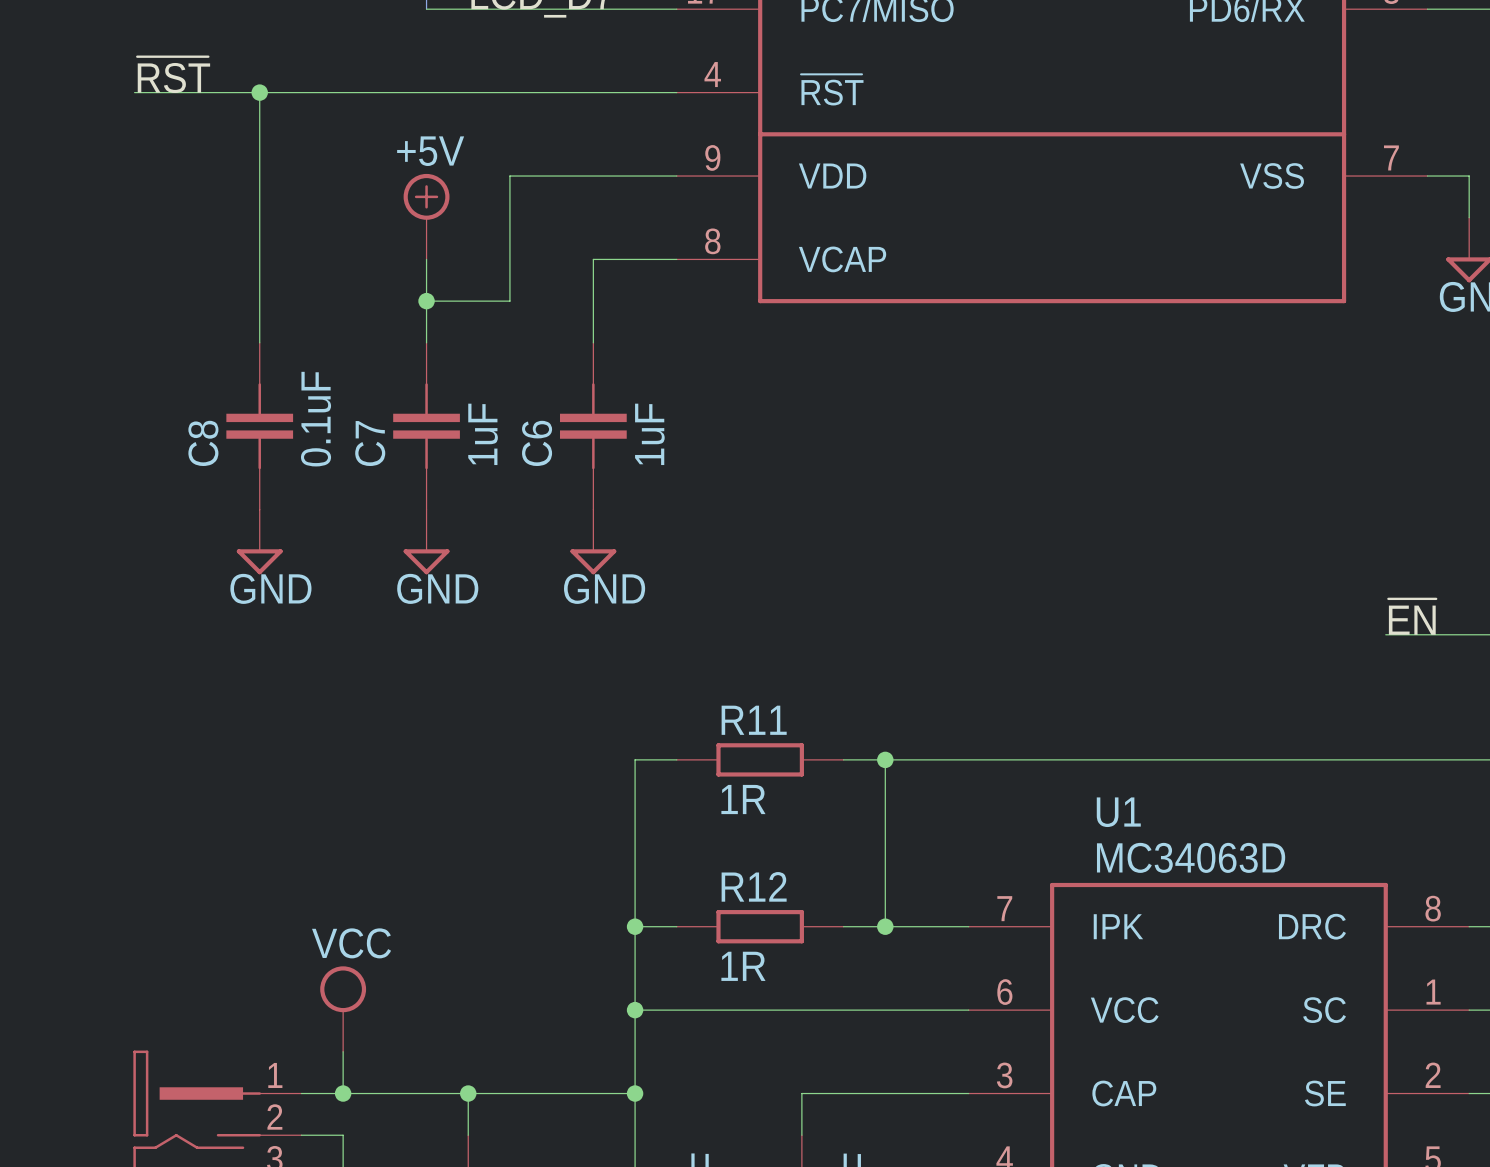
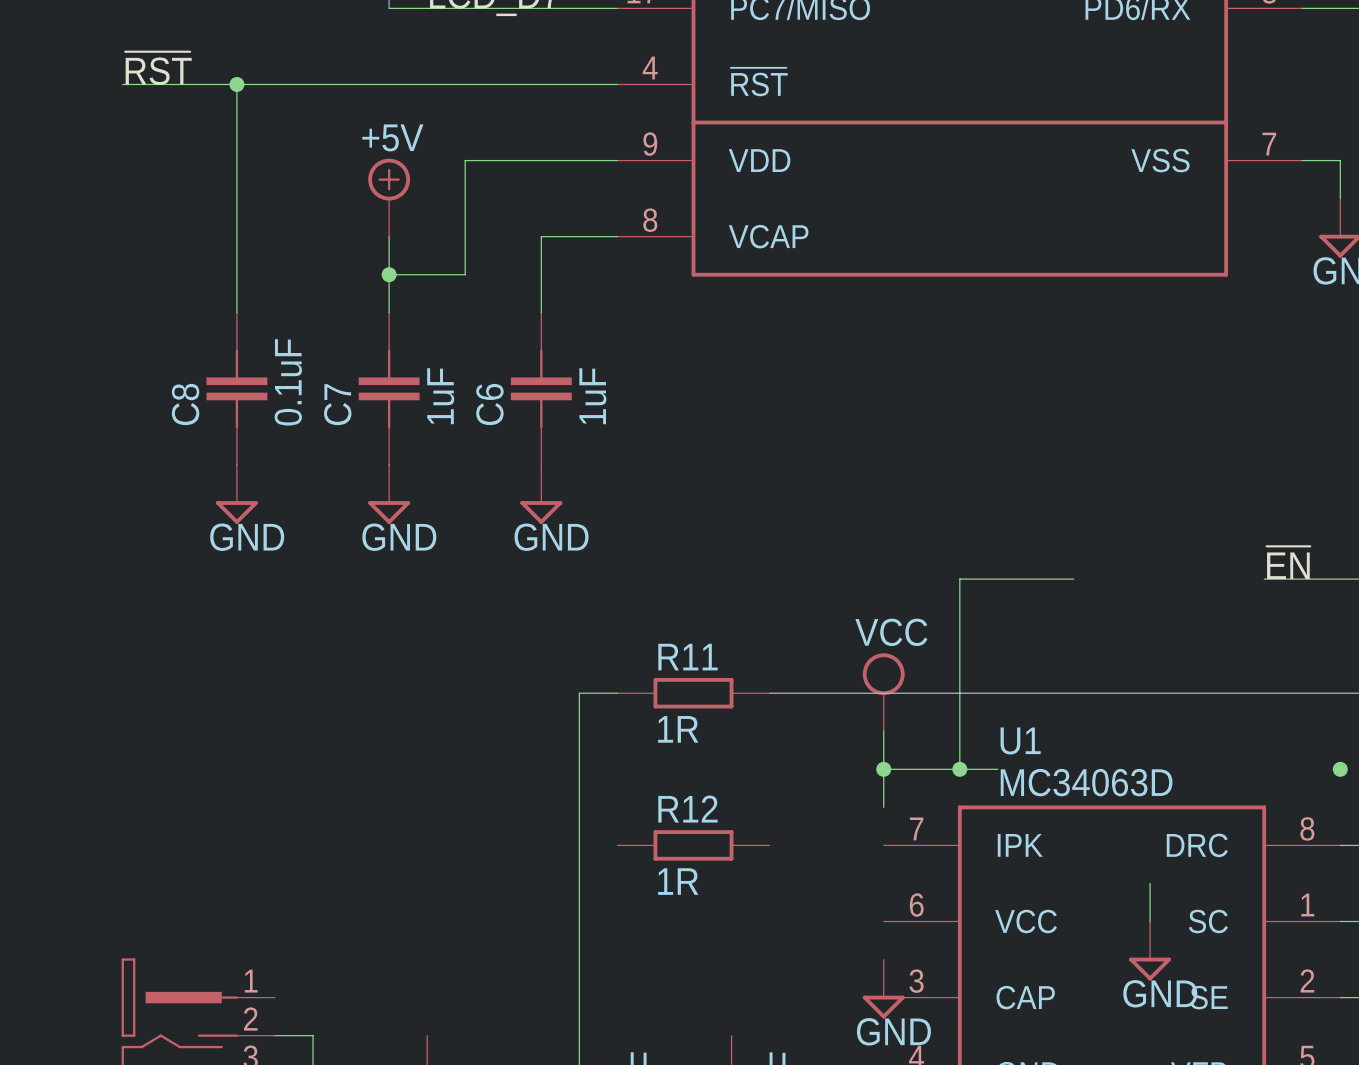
wire: none -> (1073, 579) (959, 579) (959, 769)
power symbol: none -> VCC (883, 692)
wire: (885, 759) (885, 926) -> none
junction: (885, 759) -> none
wire: none -> (883, 731) (883, 807)
junction: none -> (883, 769)
junction: none -> (959, 769)
junction: none -> (1340, 769)
wire: (635, 926) (676, 926) -> none
junction: (635, 926) -> none
wire: (843, 926) (968, 926) -> (883, 769) (997, 769)
junction: (885, 926) -> none
wire: none -> (1150, 883) (1150, 921)
power symbol: VCC (343, 1009) -> none
wire: (635, 1010) (968, 1010) -> none
junction: (635, 1010) -> none
power symbol: none -> GND (1150, 950)
wire: (343, 1051) (343, 1093) -> none
power symbol: none -> GND (883, 989)
wire: (301, 1093) (635, 1093) -> none
junction: (343, 1093) -> none
wire: (468, 1093) (468, 1135) -> none
junction: (468, 1093) -> none
junction: (635, 1093) -> none
wire: (968, 1093) (801, 1093) (801, 1135) -> none

